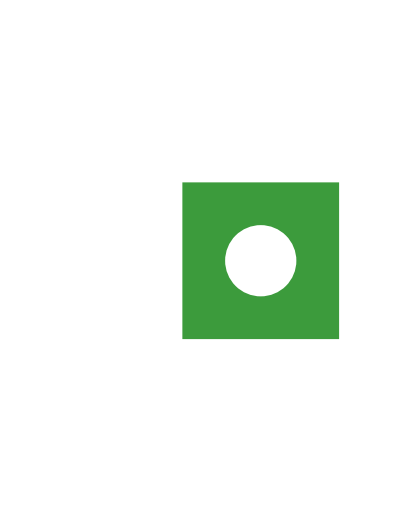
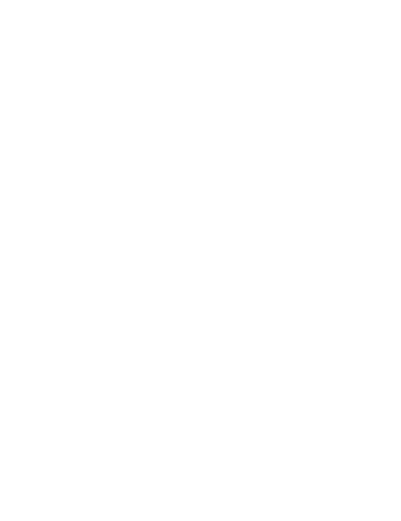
part: (260, 260) -> none

